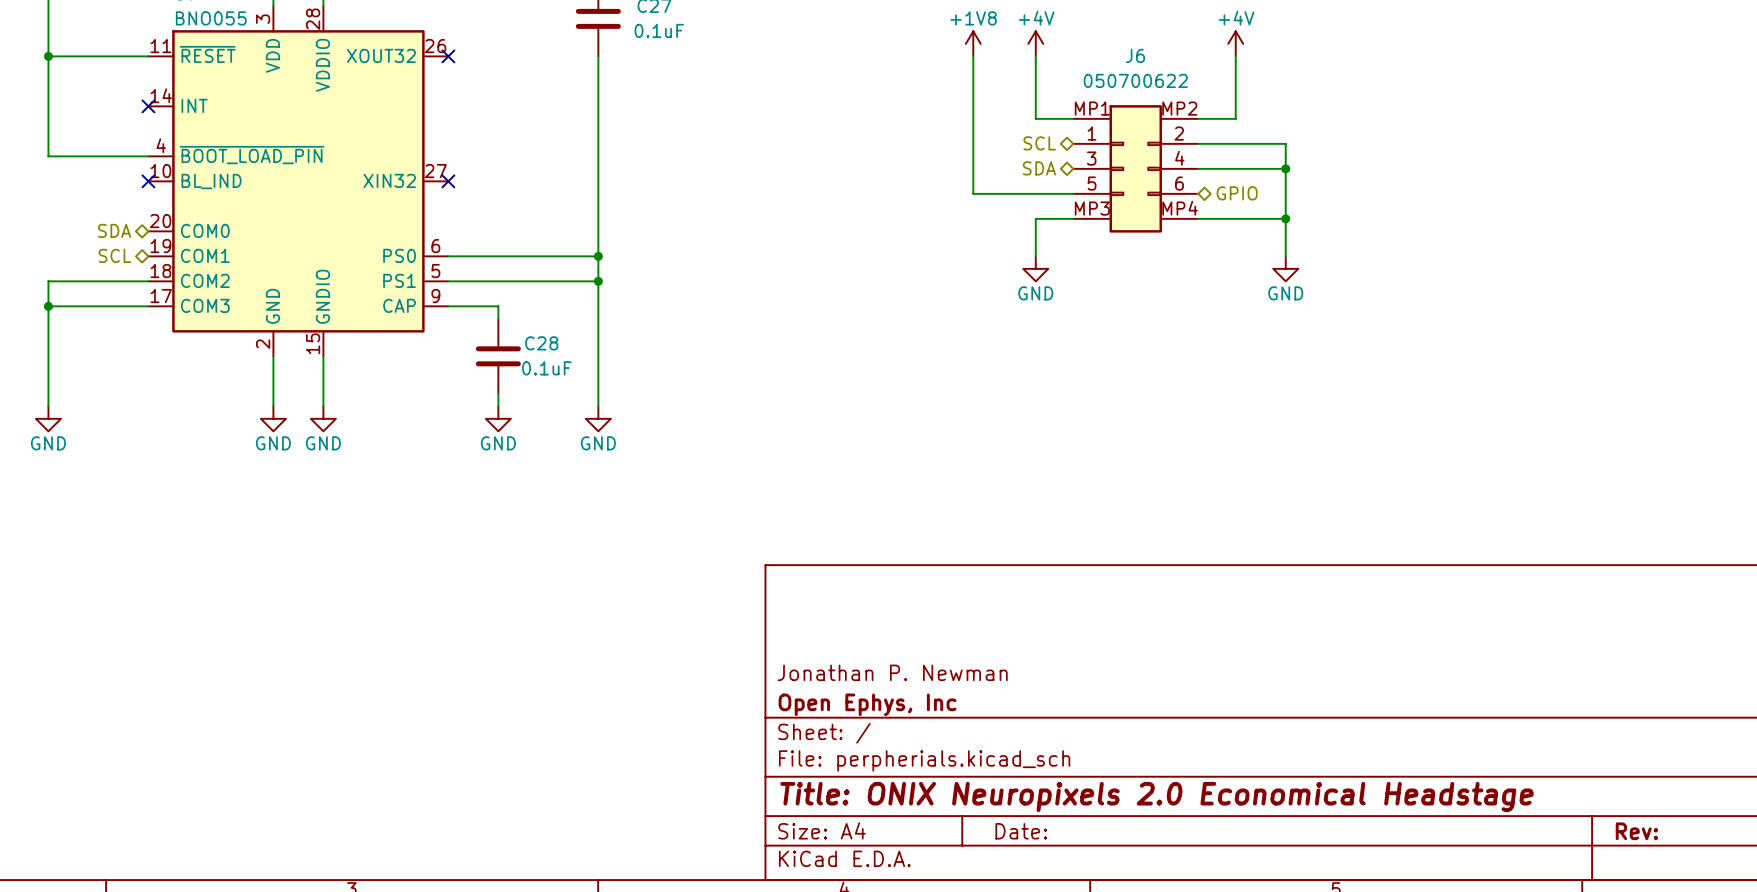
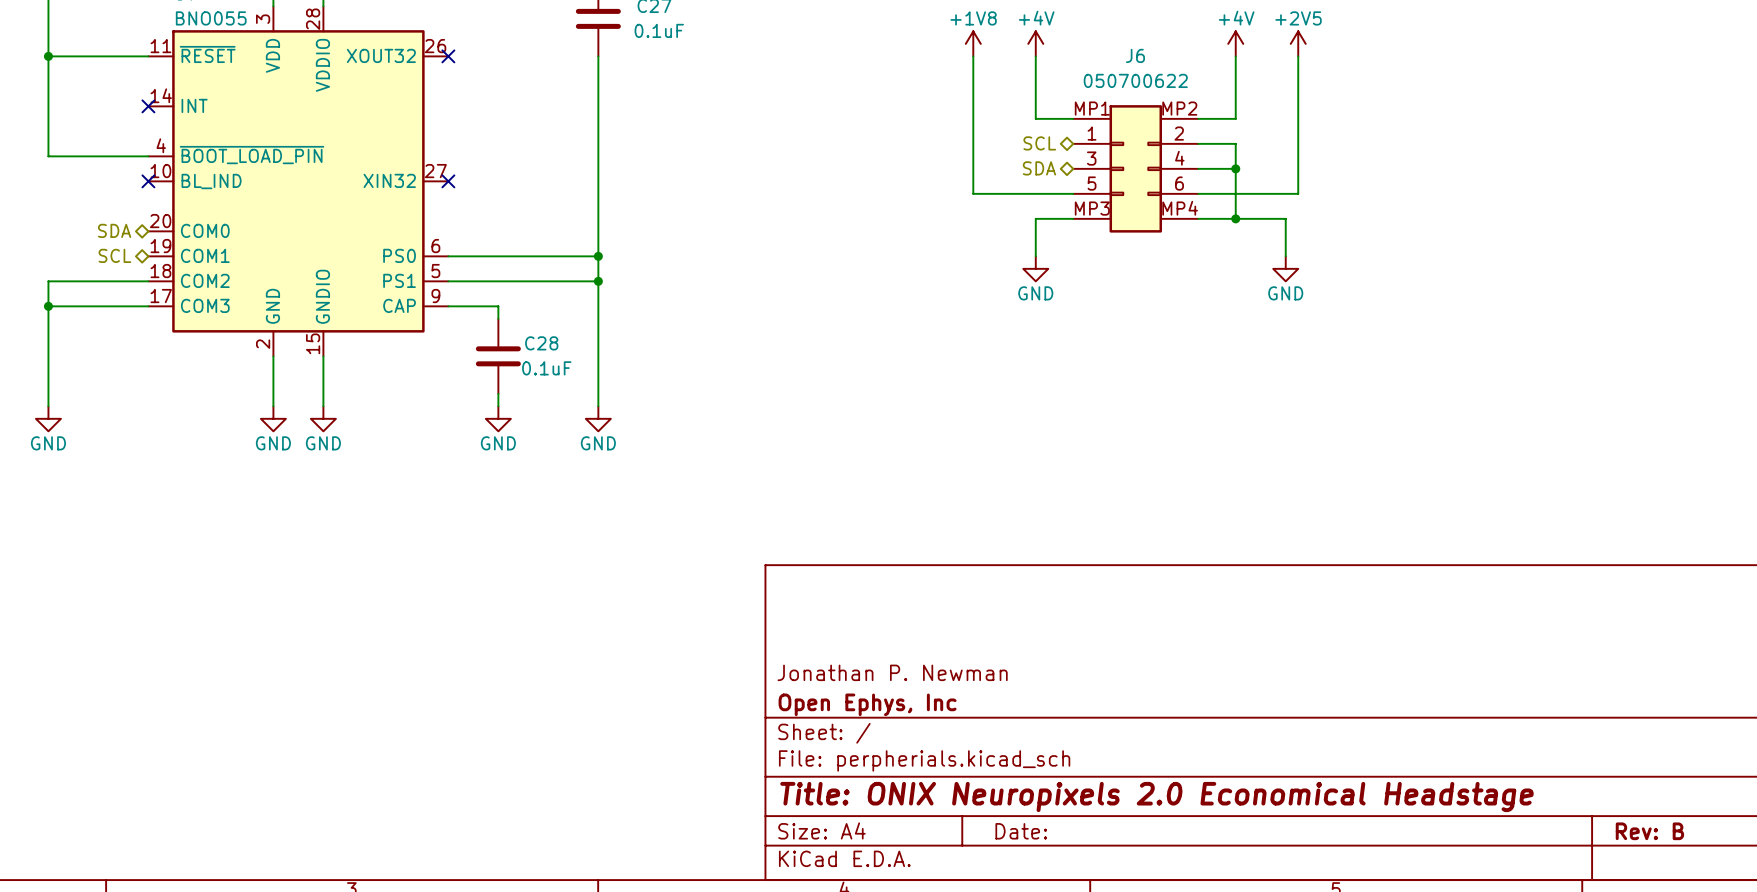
power symbol: none -> +2V5 (1298, 43)
wire: none -> (1298, 56) (1298, 193) (1198, 193)
wire: (1235, 143) (1285, 143) (1285, 218) -> (1235, 143) (1235, 218)
wire: (1235, 168) (1285, 168) -> none
junction: none -> (1235, 168)
junction: (1285, 168) -> none
hierarchical label: GPIO (1237, 193) -> none
junction: none -> (1235, 218)
junction: (1285, 218) -> none
title block: Rev: (1636, 831) -> Rev: B (1649, 831)

